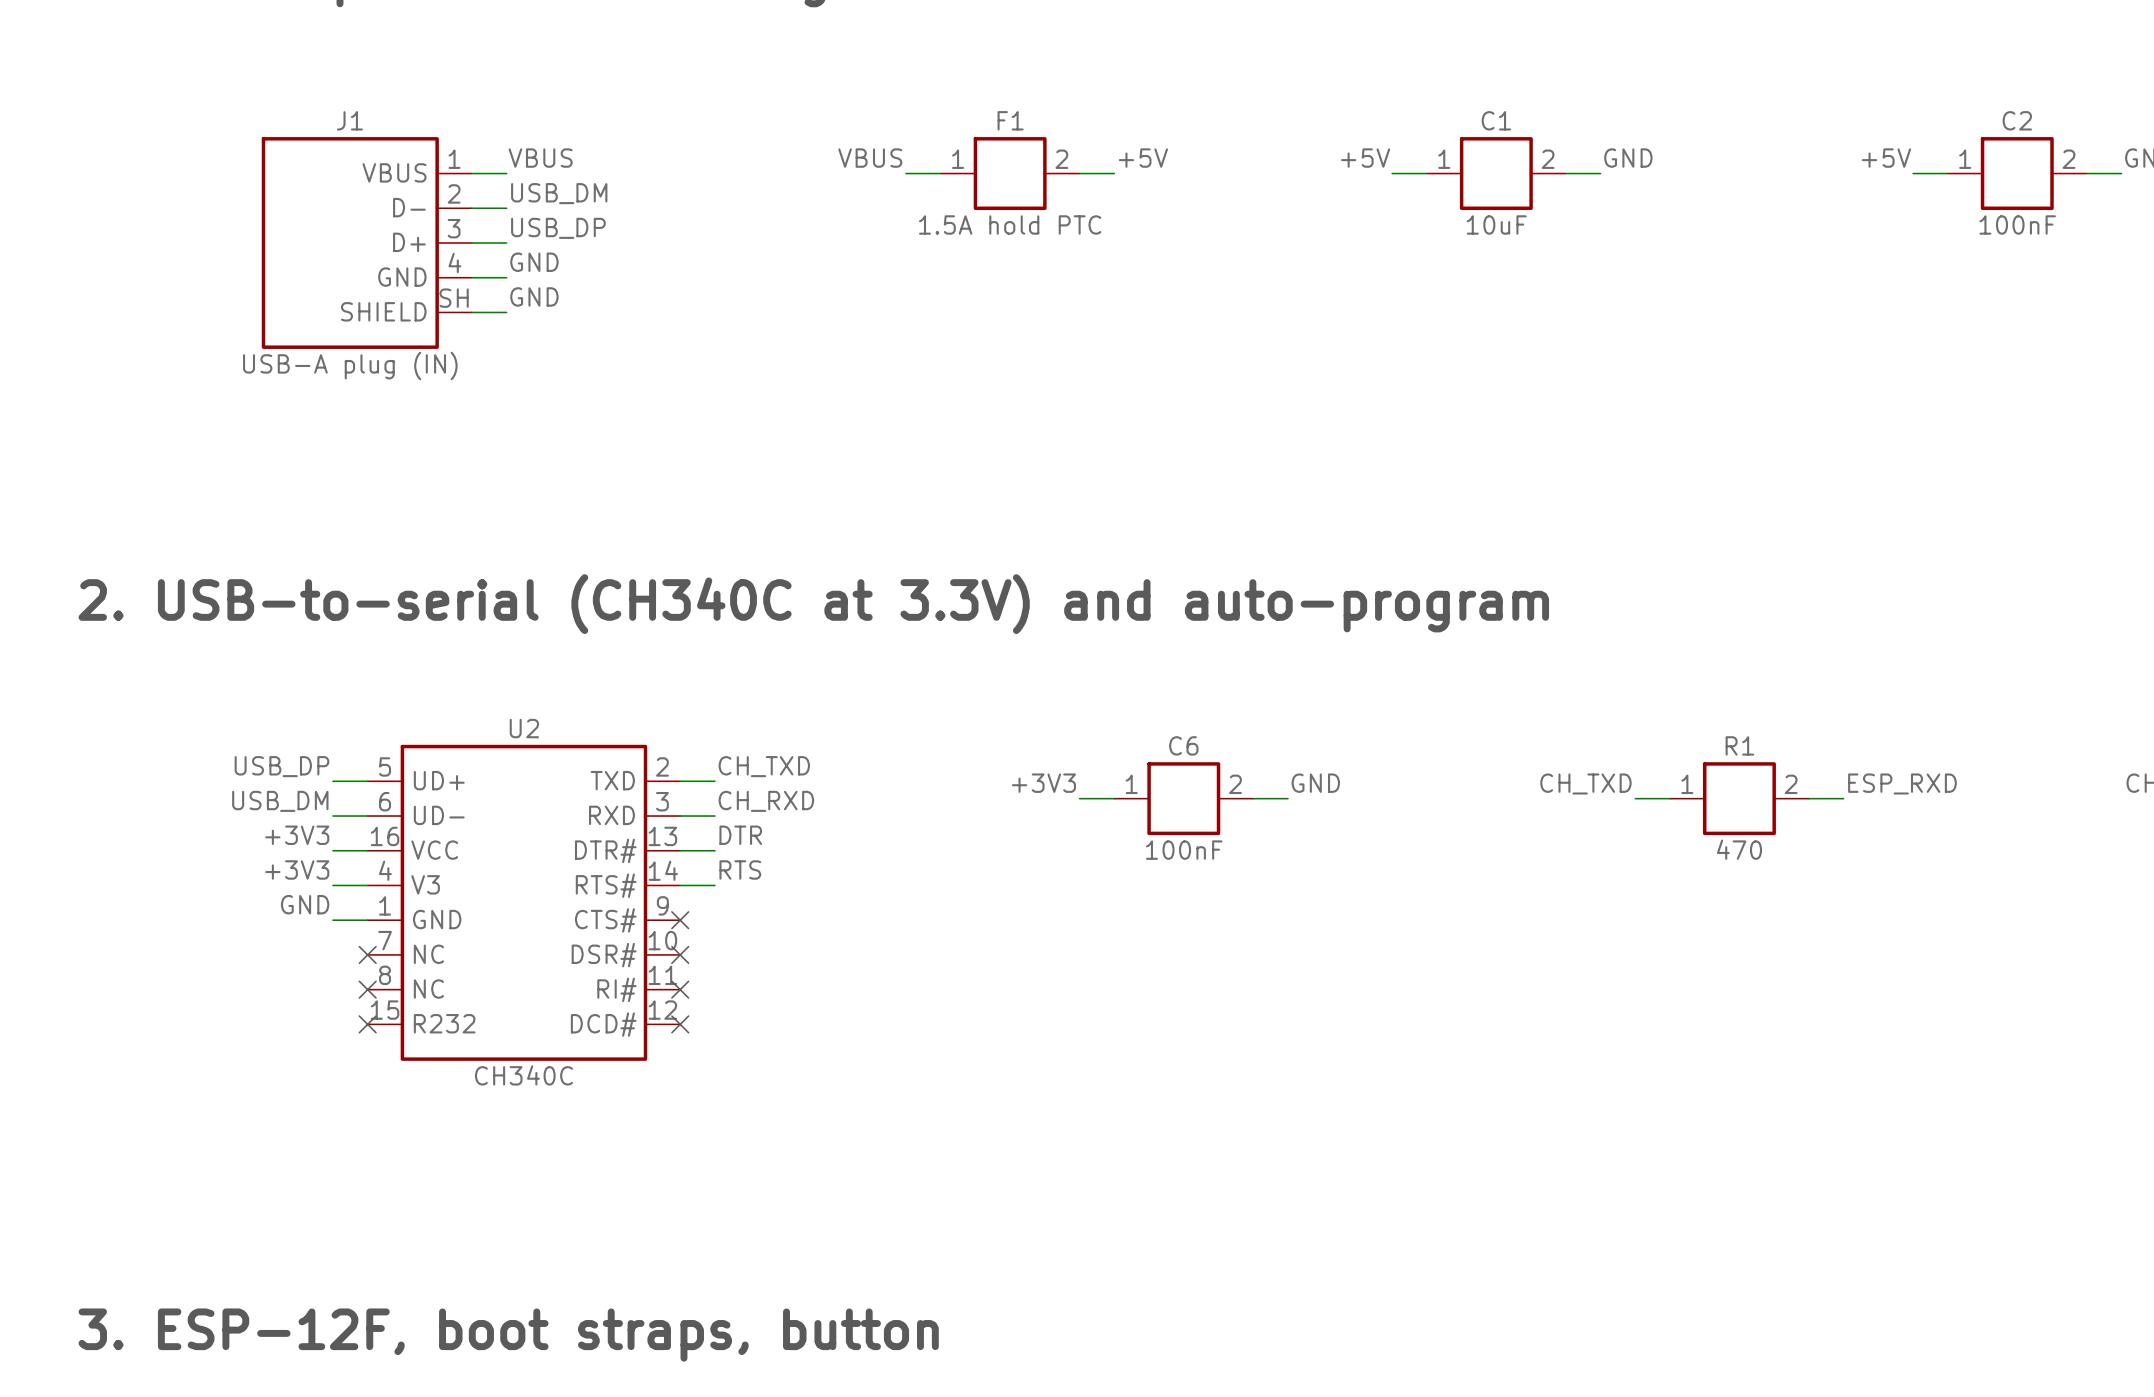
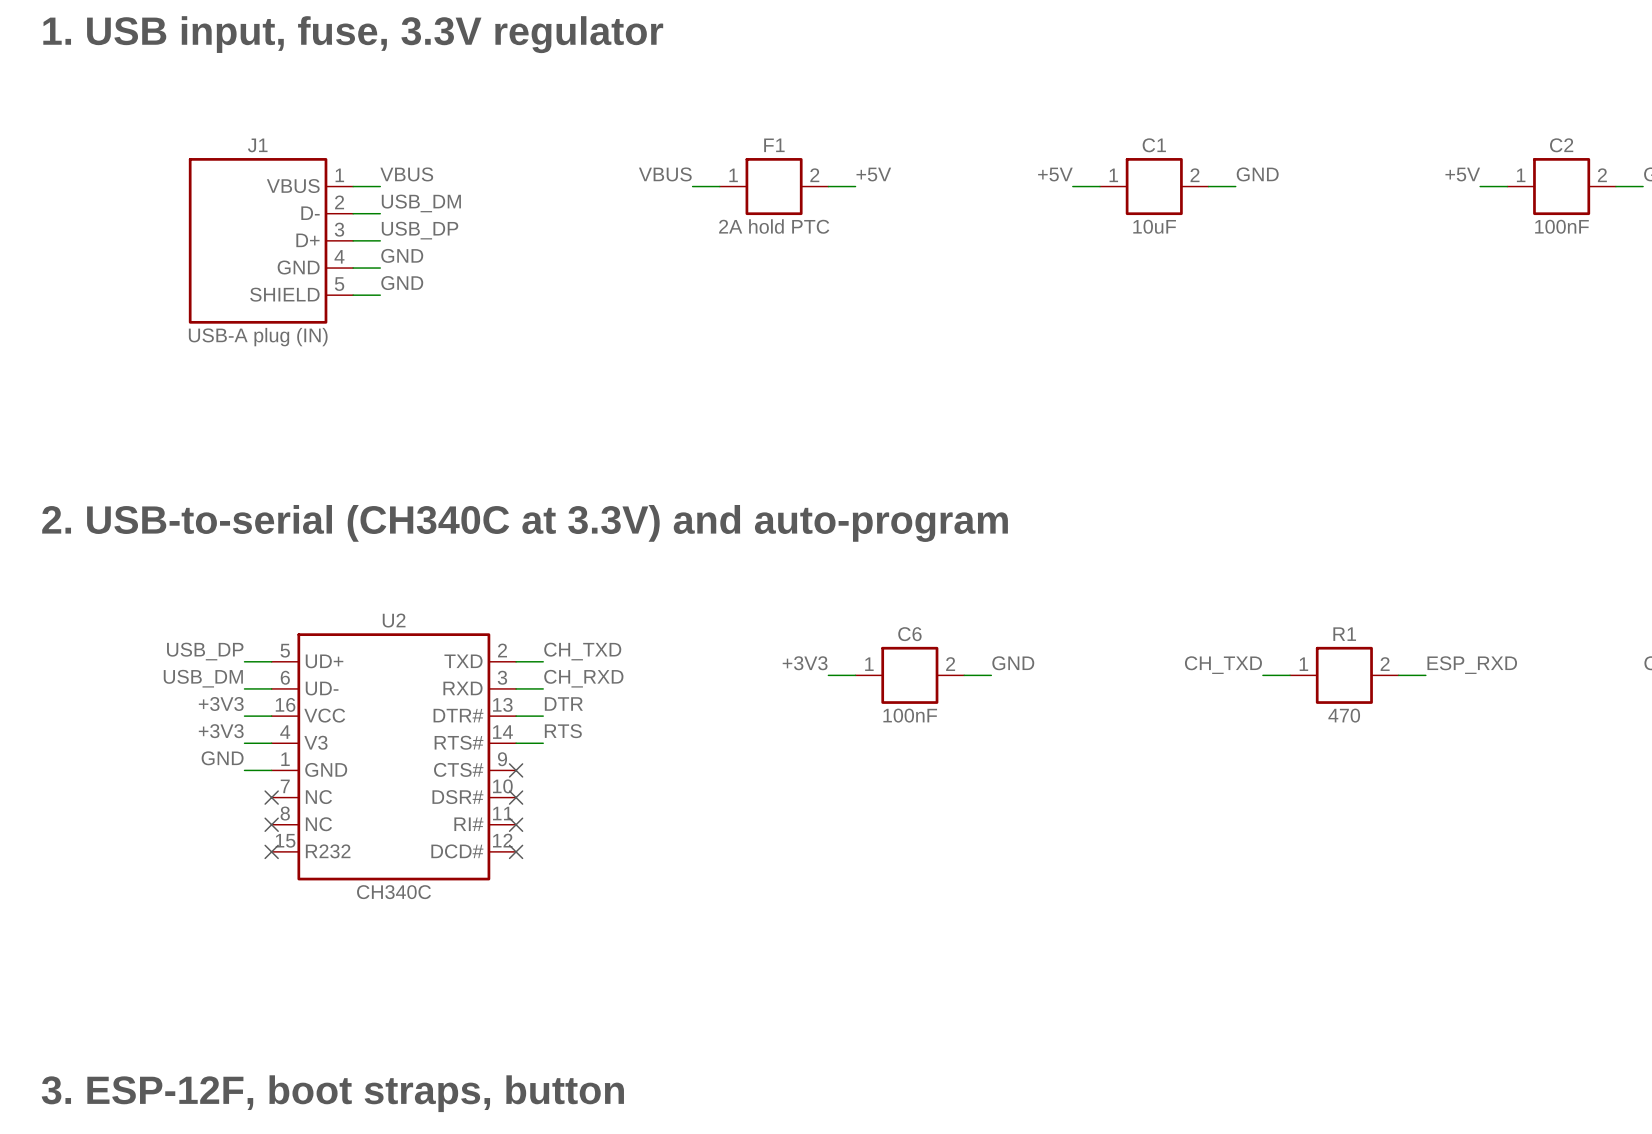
F1 value: 1.5A hold PTC (1010, 224) -> 2A hold PTC (774, 226)
J1 pin number: SH (454, 298) -> 5 (339, 284)

